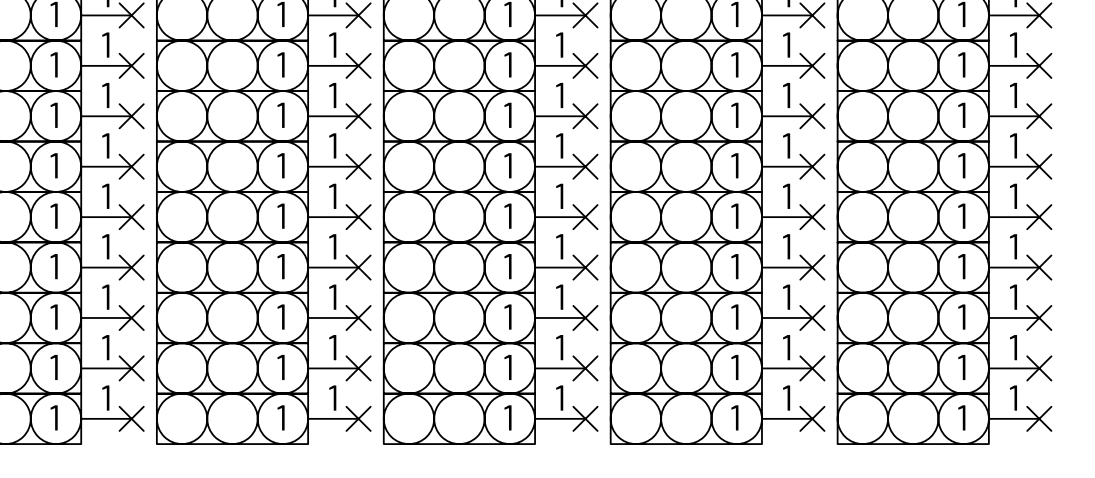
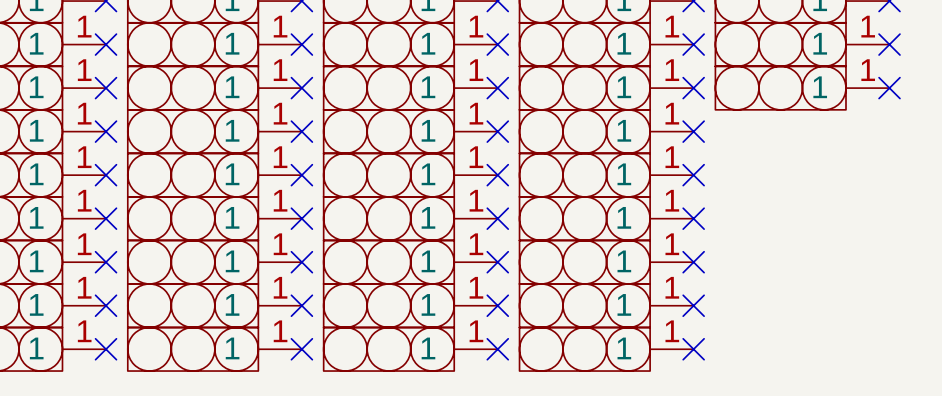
part: (938, 166) -> none
no-connect mark: (1039, 166) -> none
part: (938, 217) -> none
no-connect mark: (1039, 217) -> none
part: (938, 267) -> none
no-connect mark: (1039, 267) -> none
part: (938, 318) -> none
no-connect mark: (1039, 318) -> none
part: (938, 368) -> none
no-connect mark: (1039, 368) -> none
part: (938, 418) -> none
no-connect mark: (1039, 418) -> none

